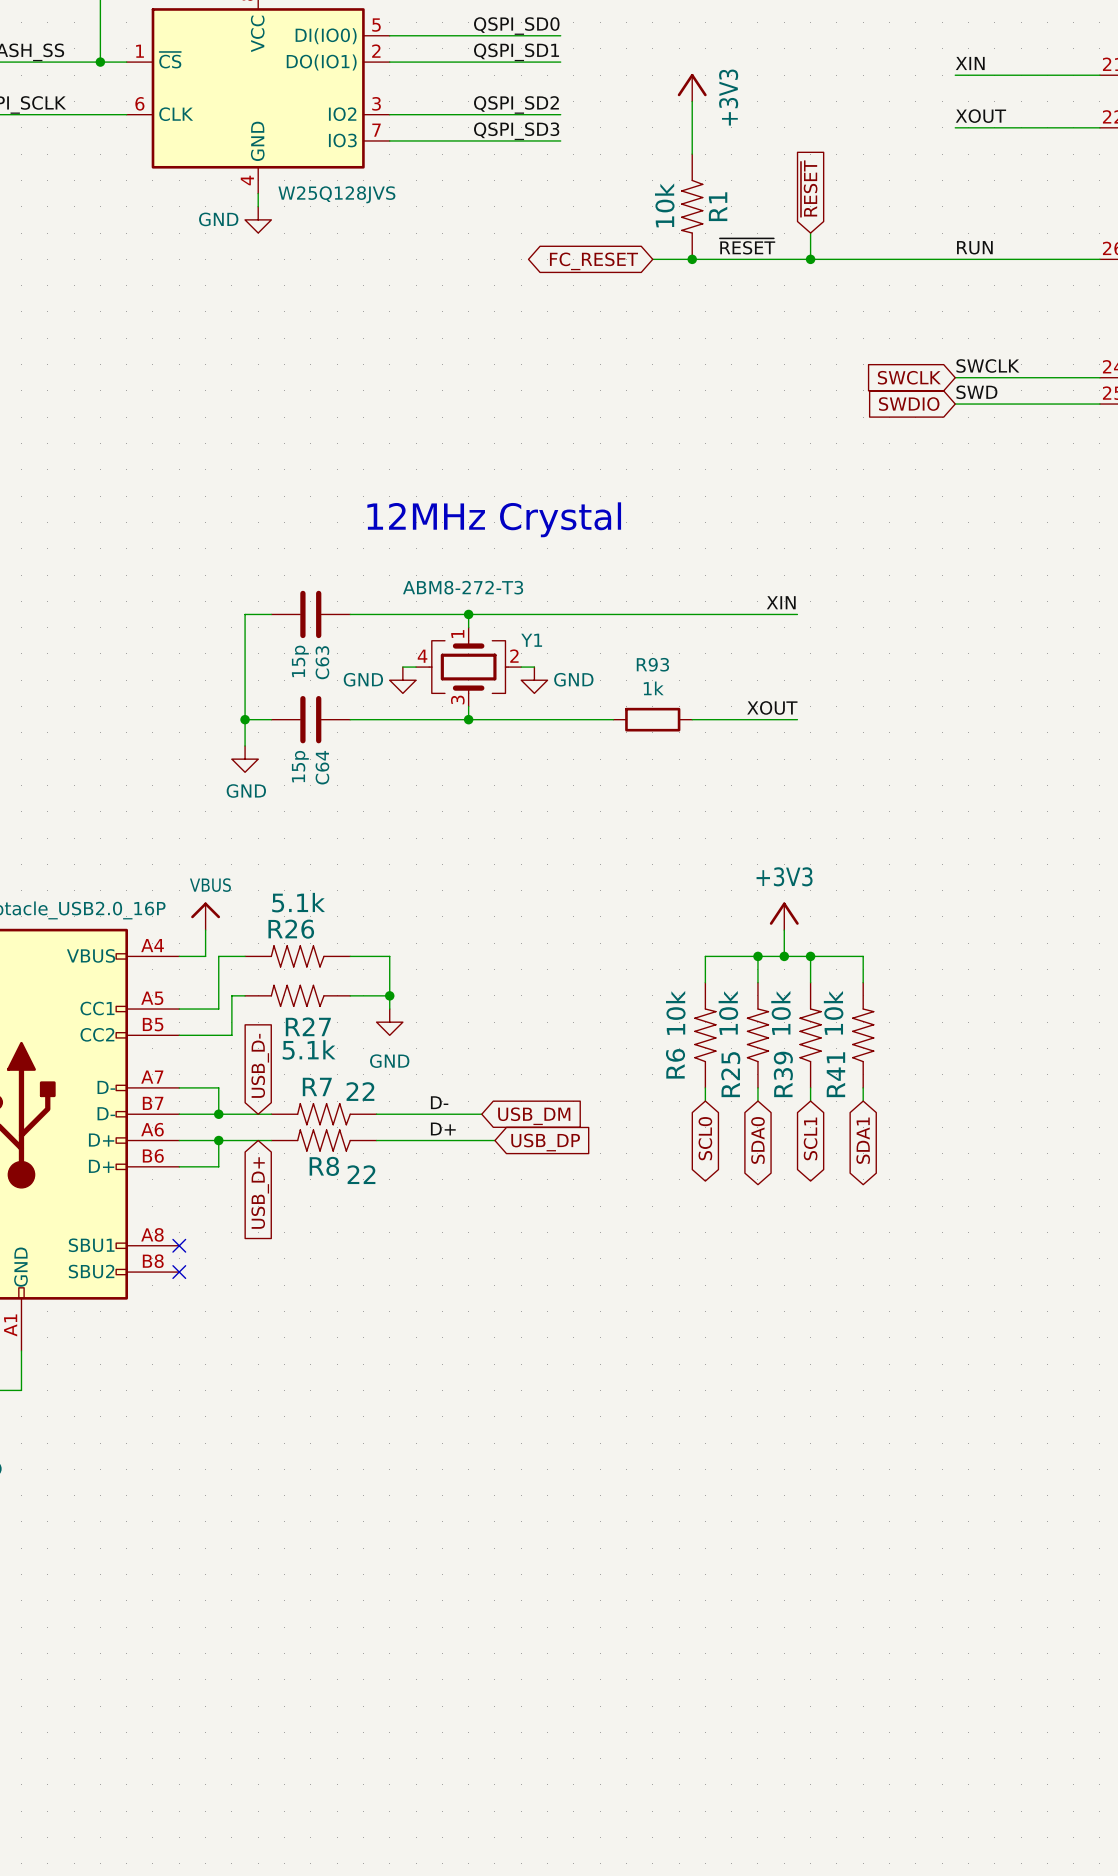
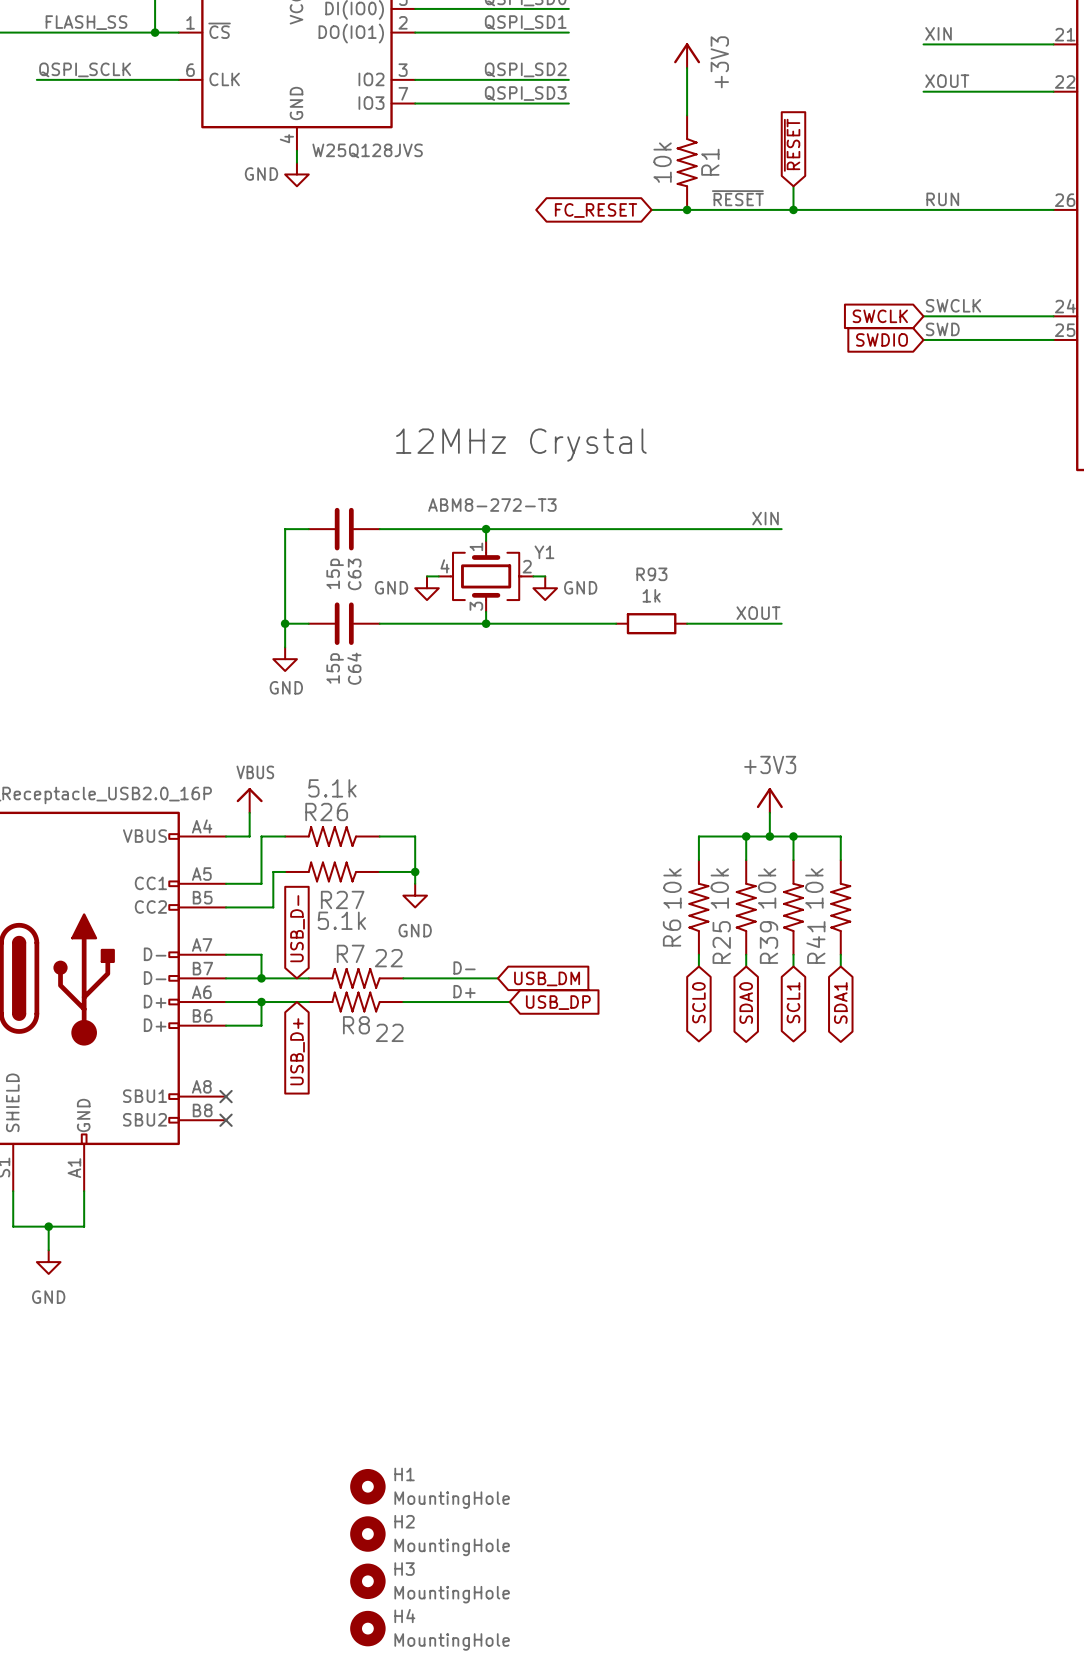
H1: none -> MountingHole (367, 1486)
H2: none -> MountingHole (367, 1534)
H3: none -> MountingHole (367, 1581)
H4: none -> MountingHole (367, 1628)

